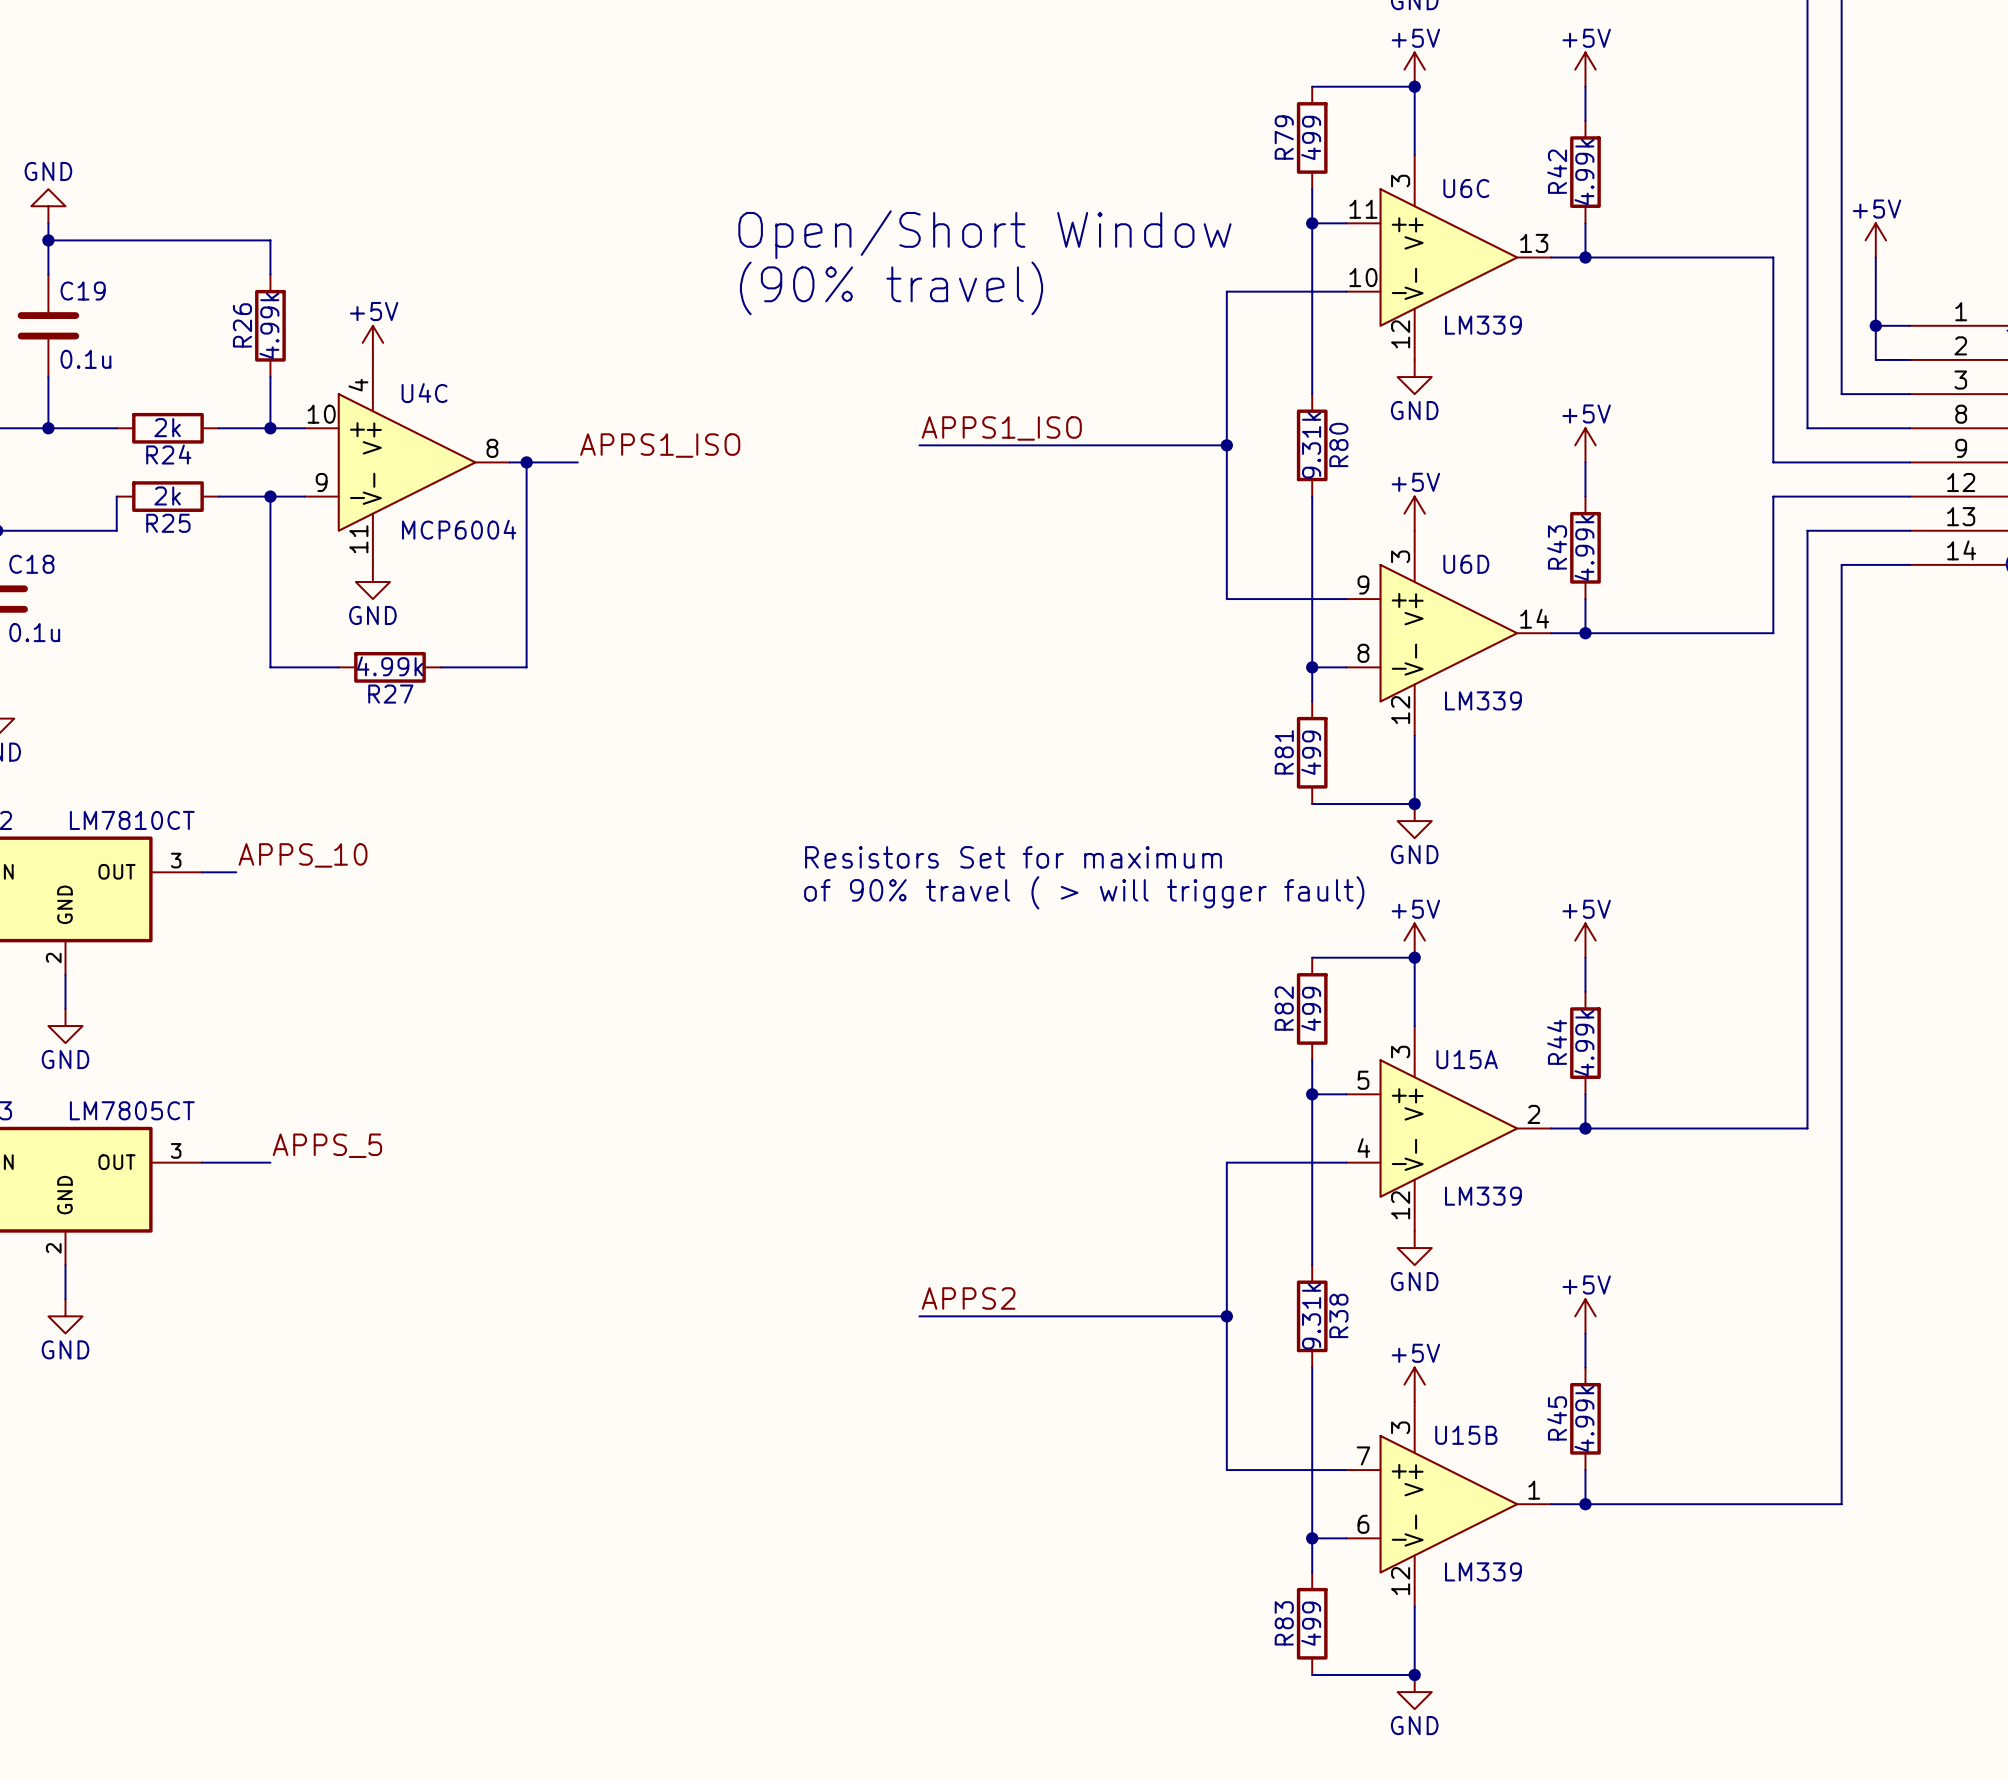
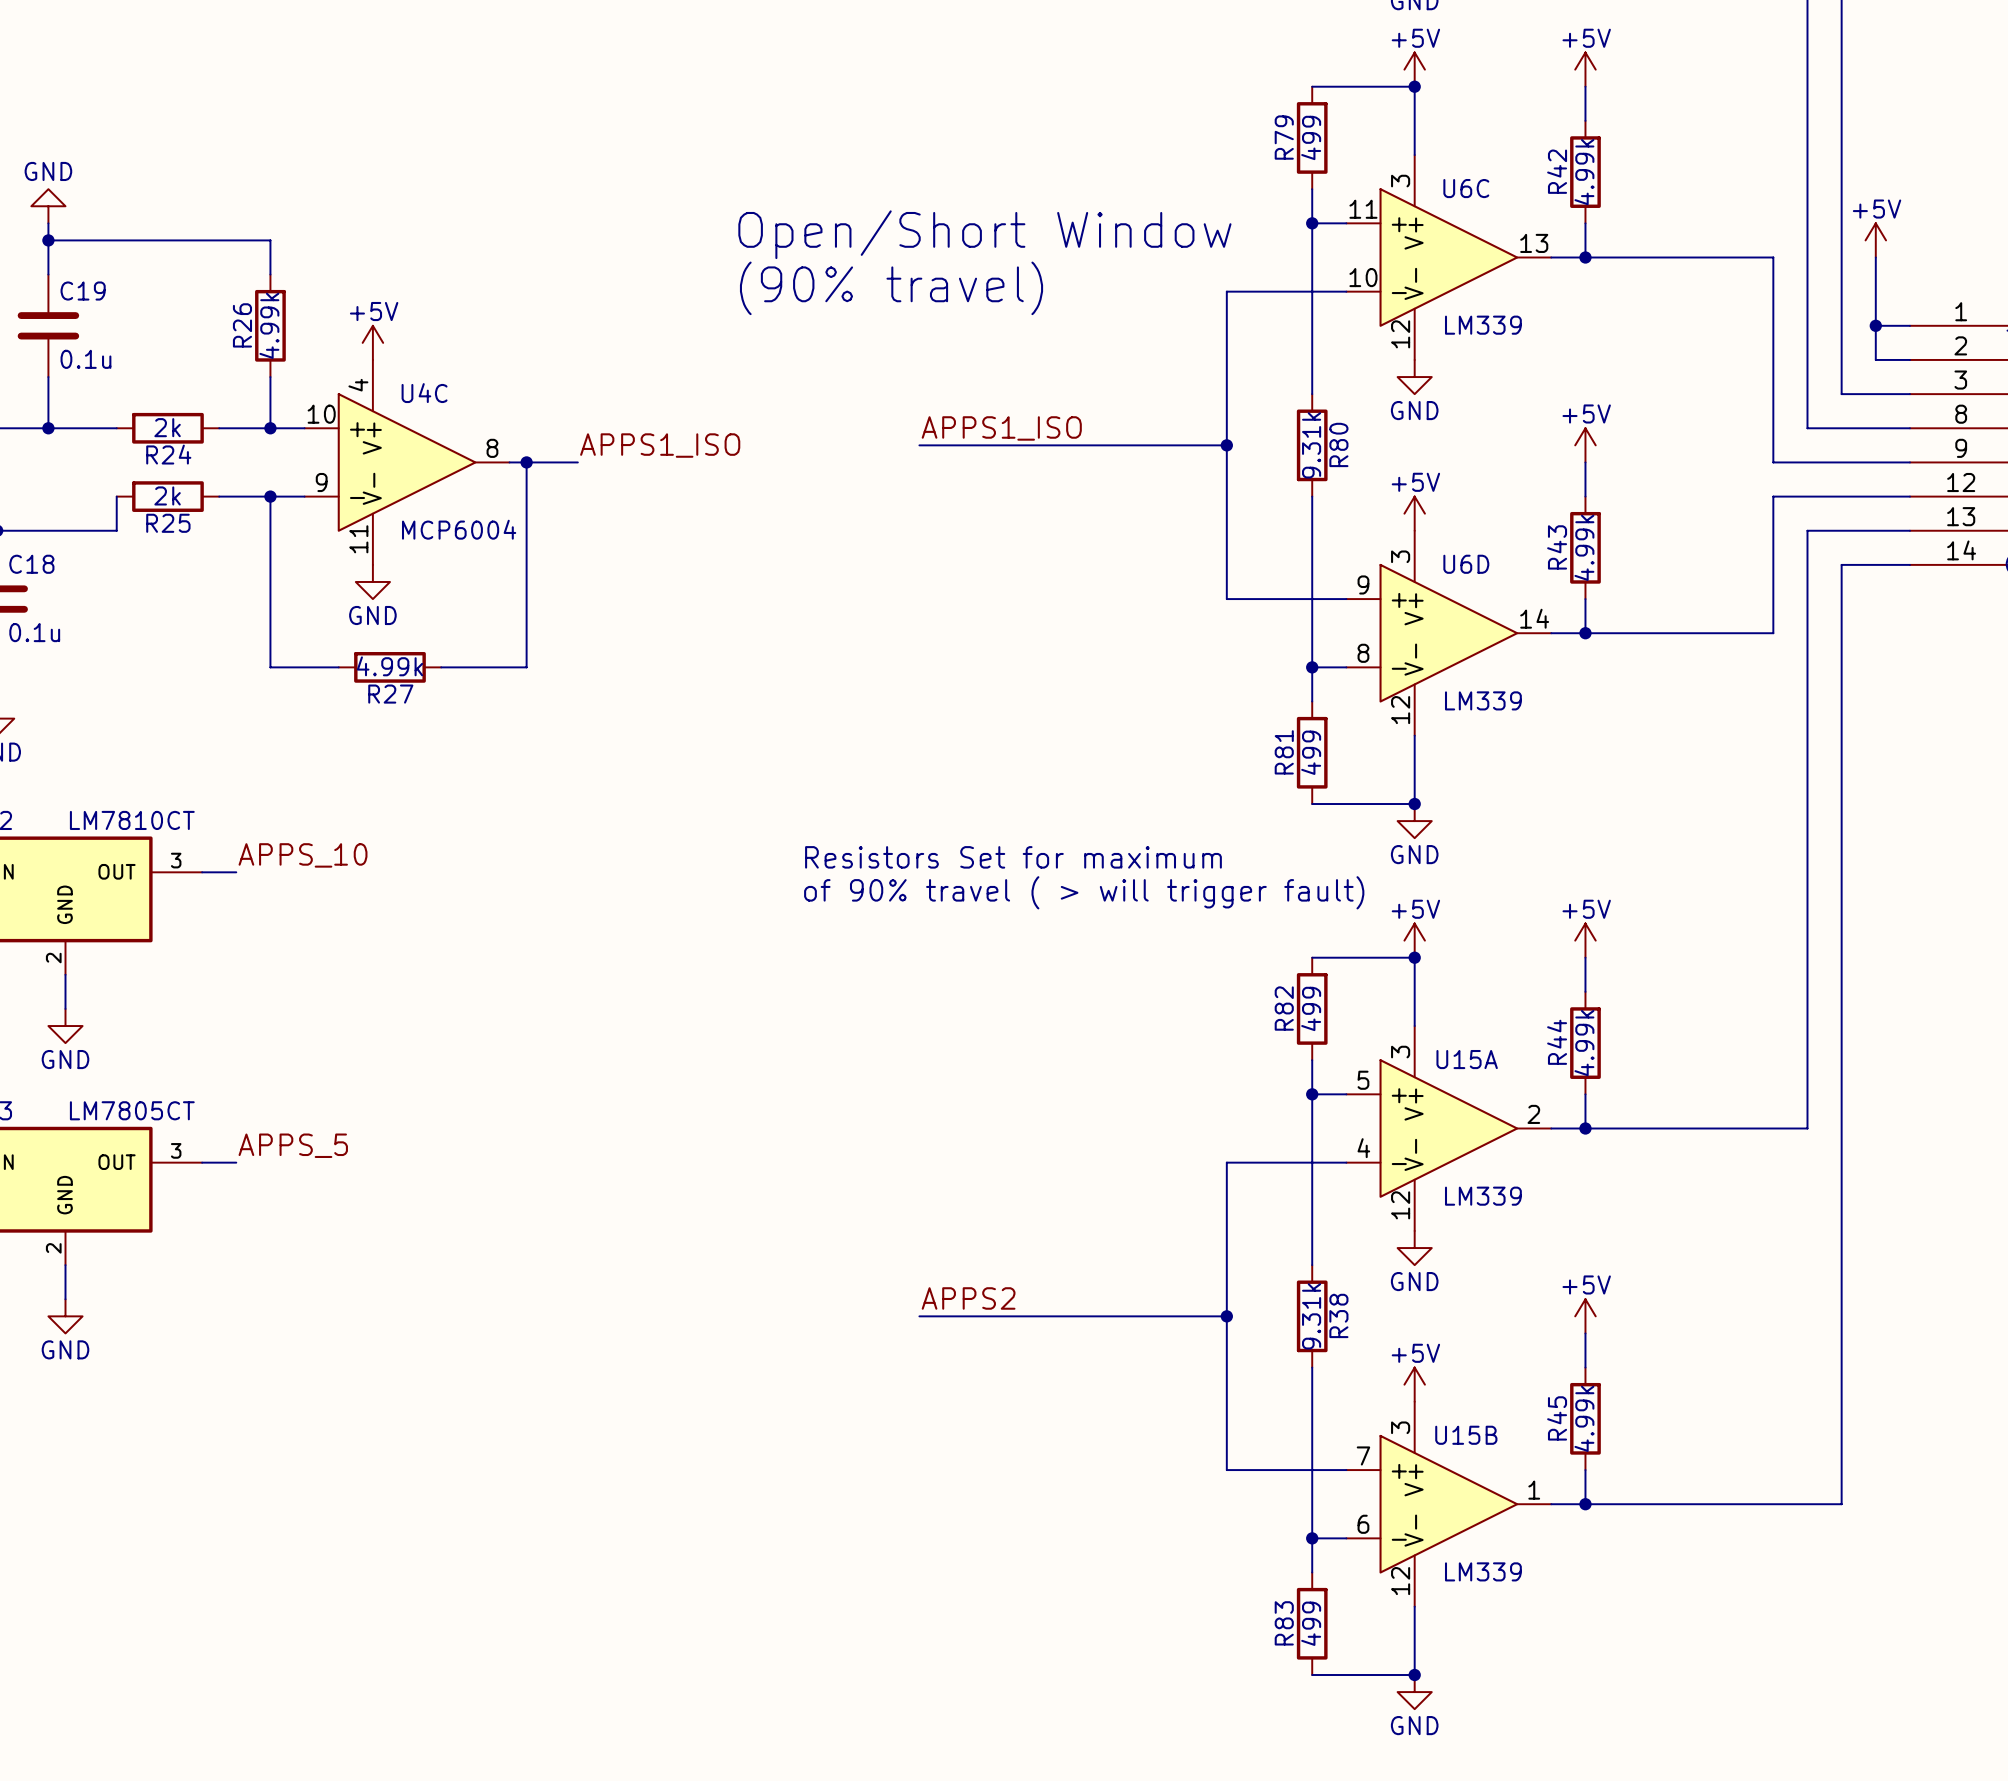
label position: APPS_5 (327, 1145) -> APPS_5 (293, 1145)
wire: (236, 1162) (270, 1162) -> none

